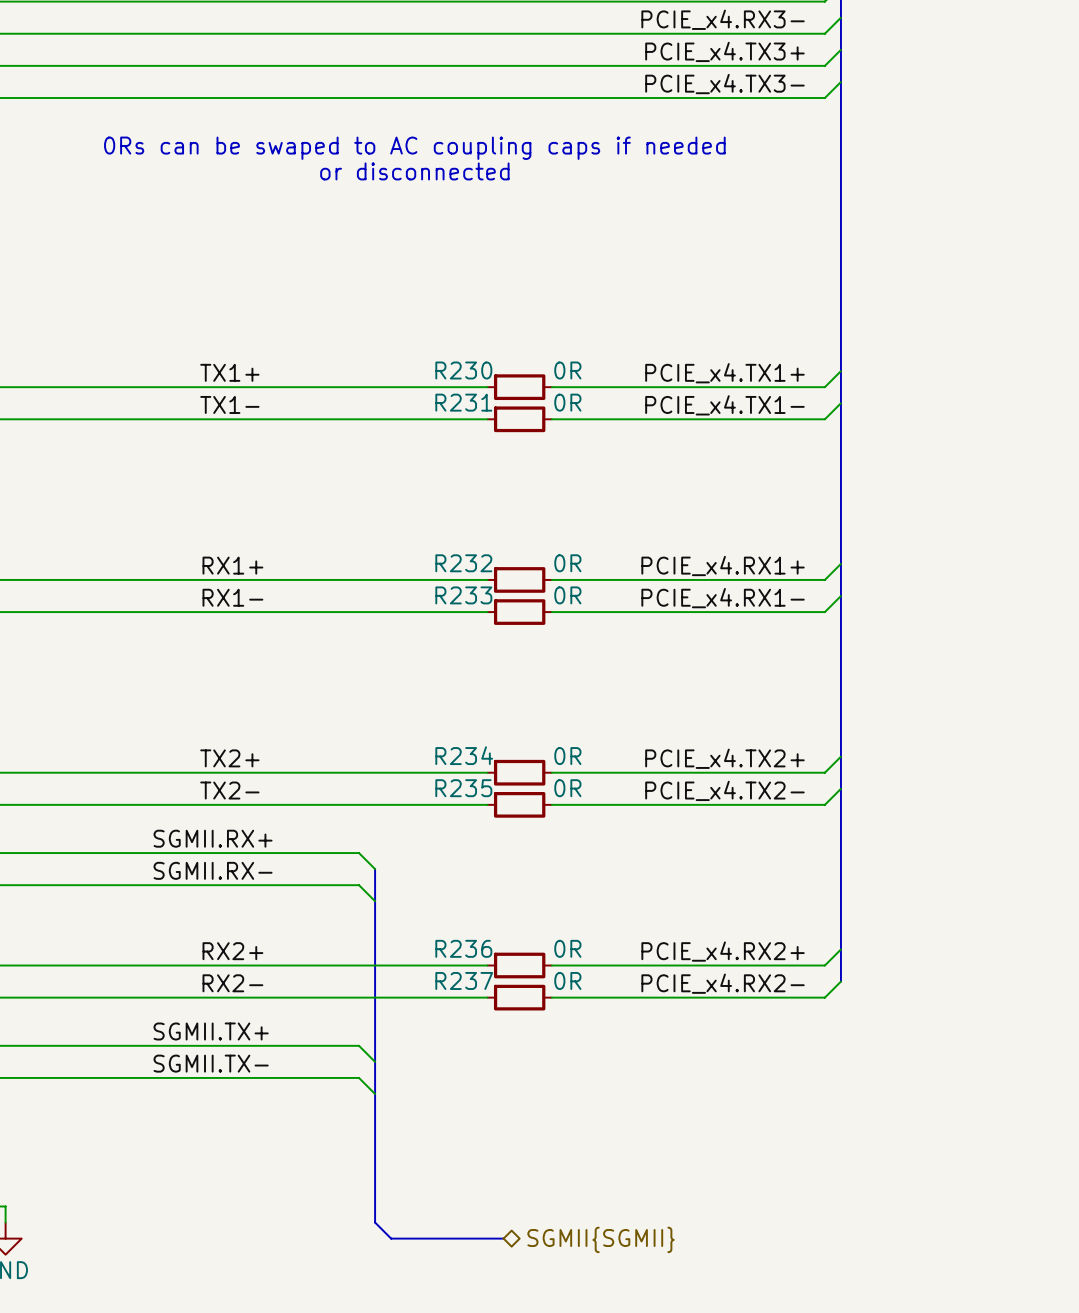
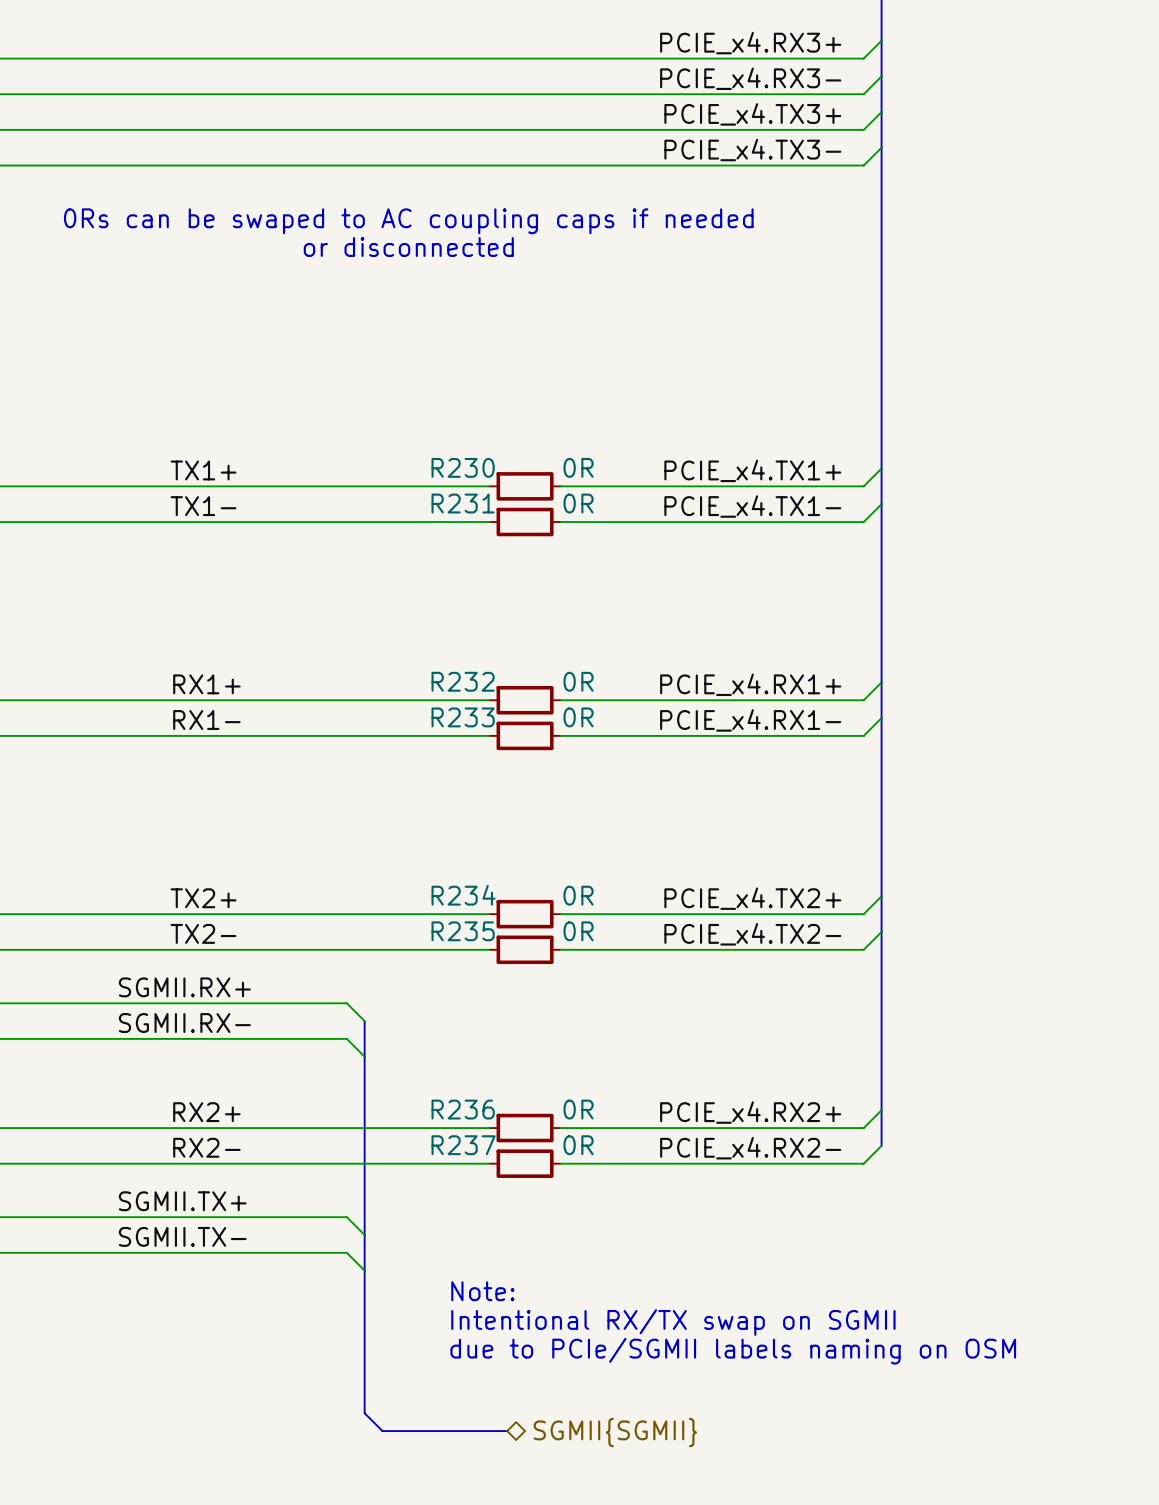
text: none -> Note: (482, 1291)
text: none -> Intentional RX/TX swap on SGMII (673, 1322)
text: none -> due to PCIe/SGMII labels naming on OSM (733, 1351)

